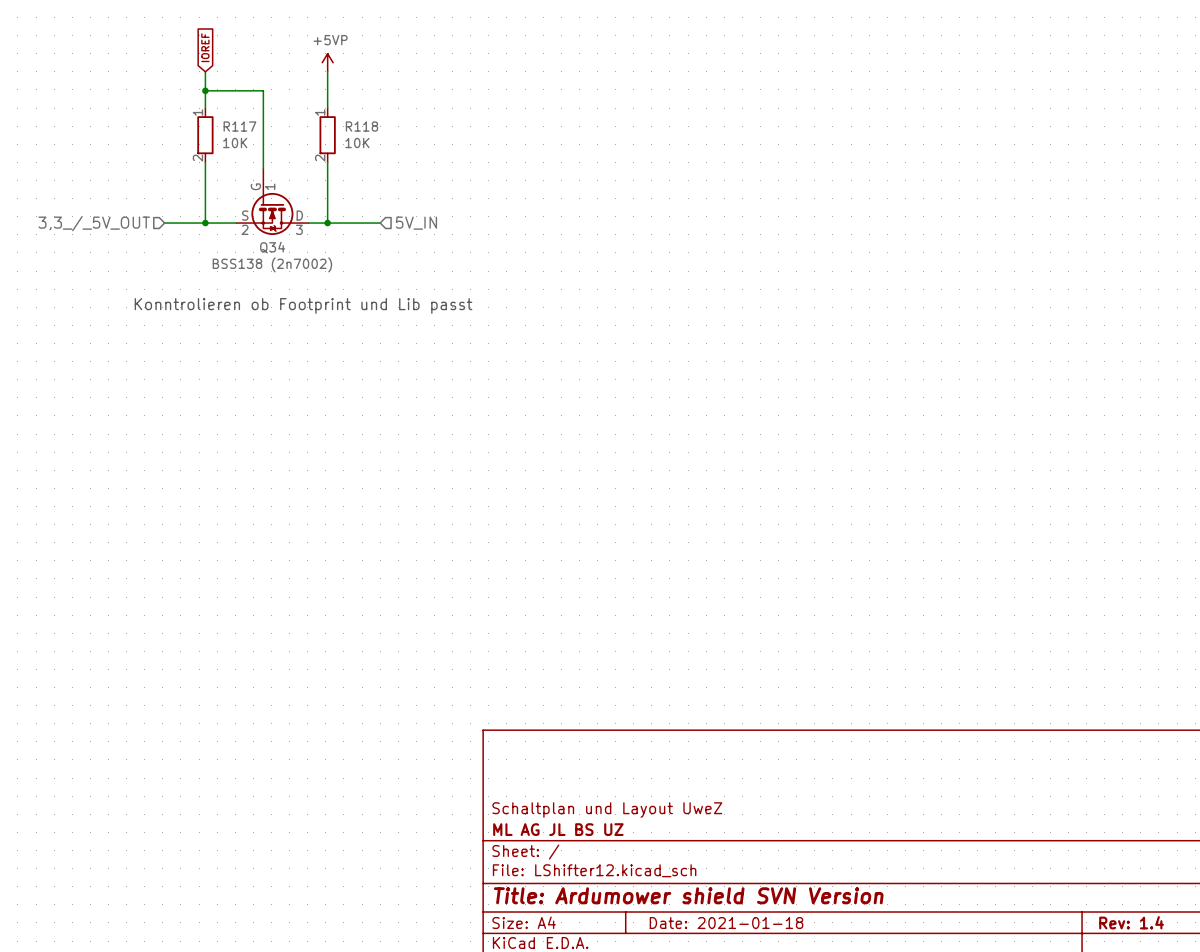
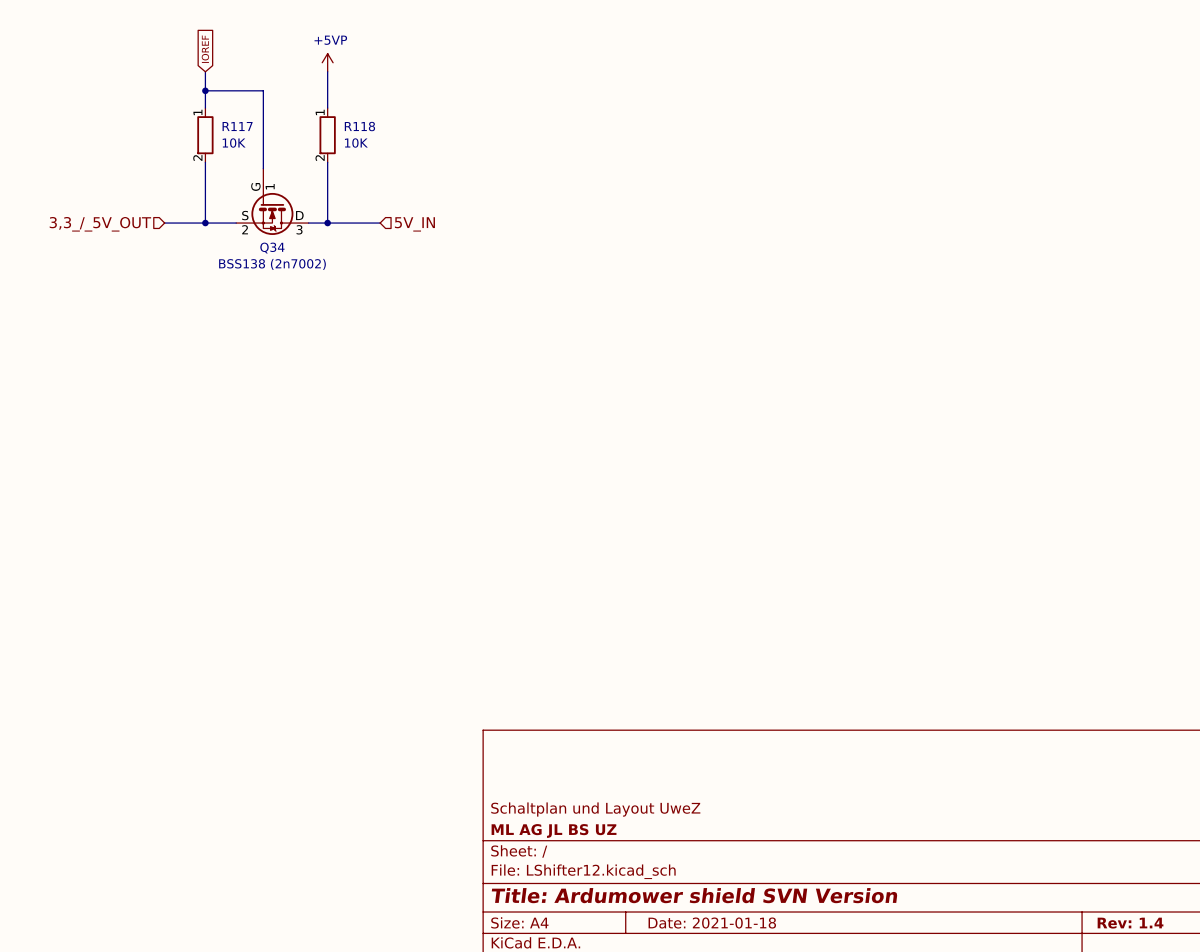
text: Konntrolieren ob Footprint und Lib passt (303, 305) -> none

